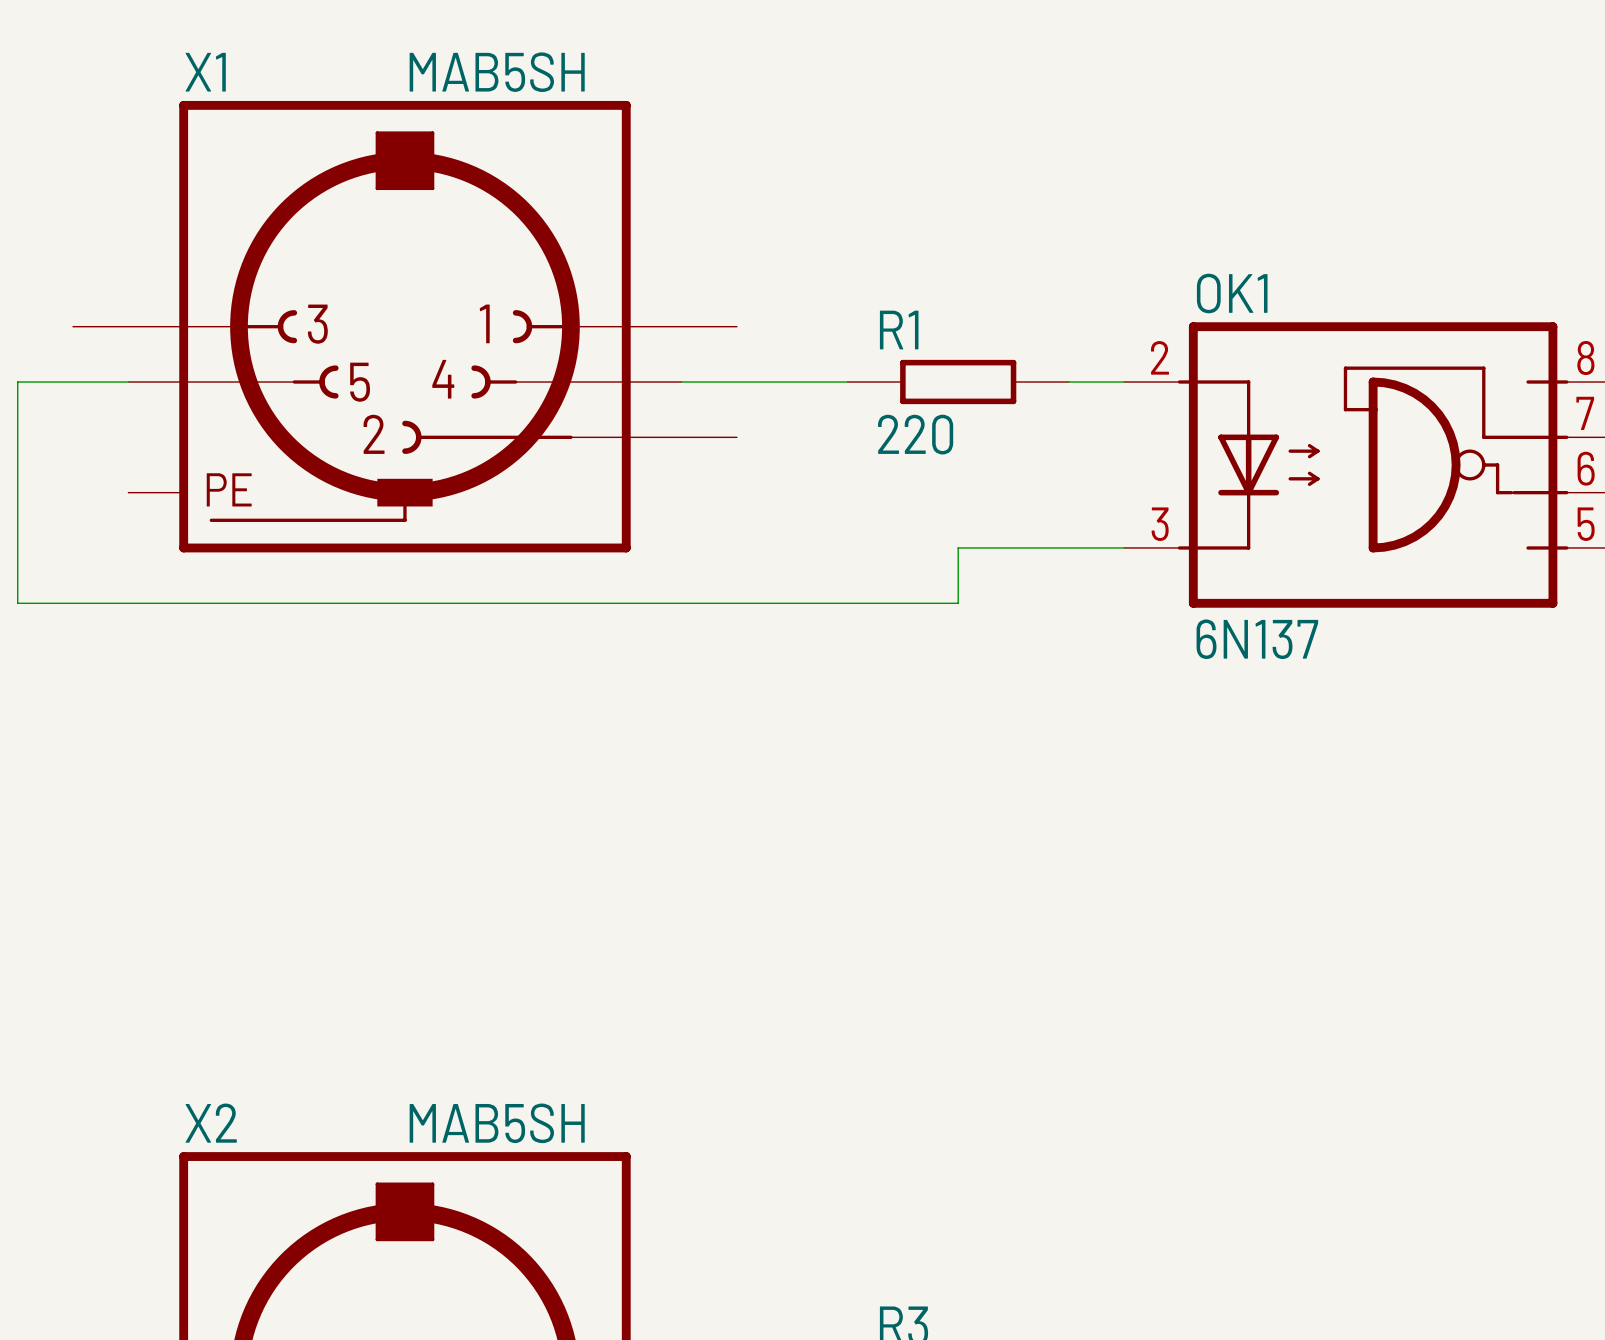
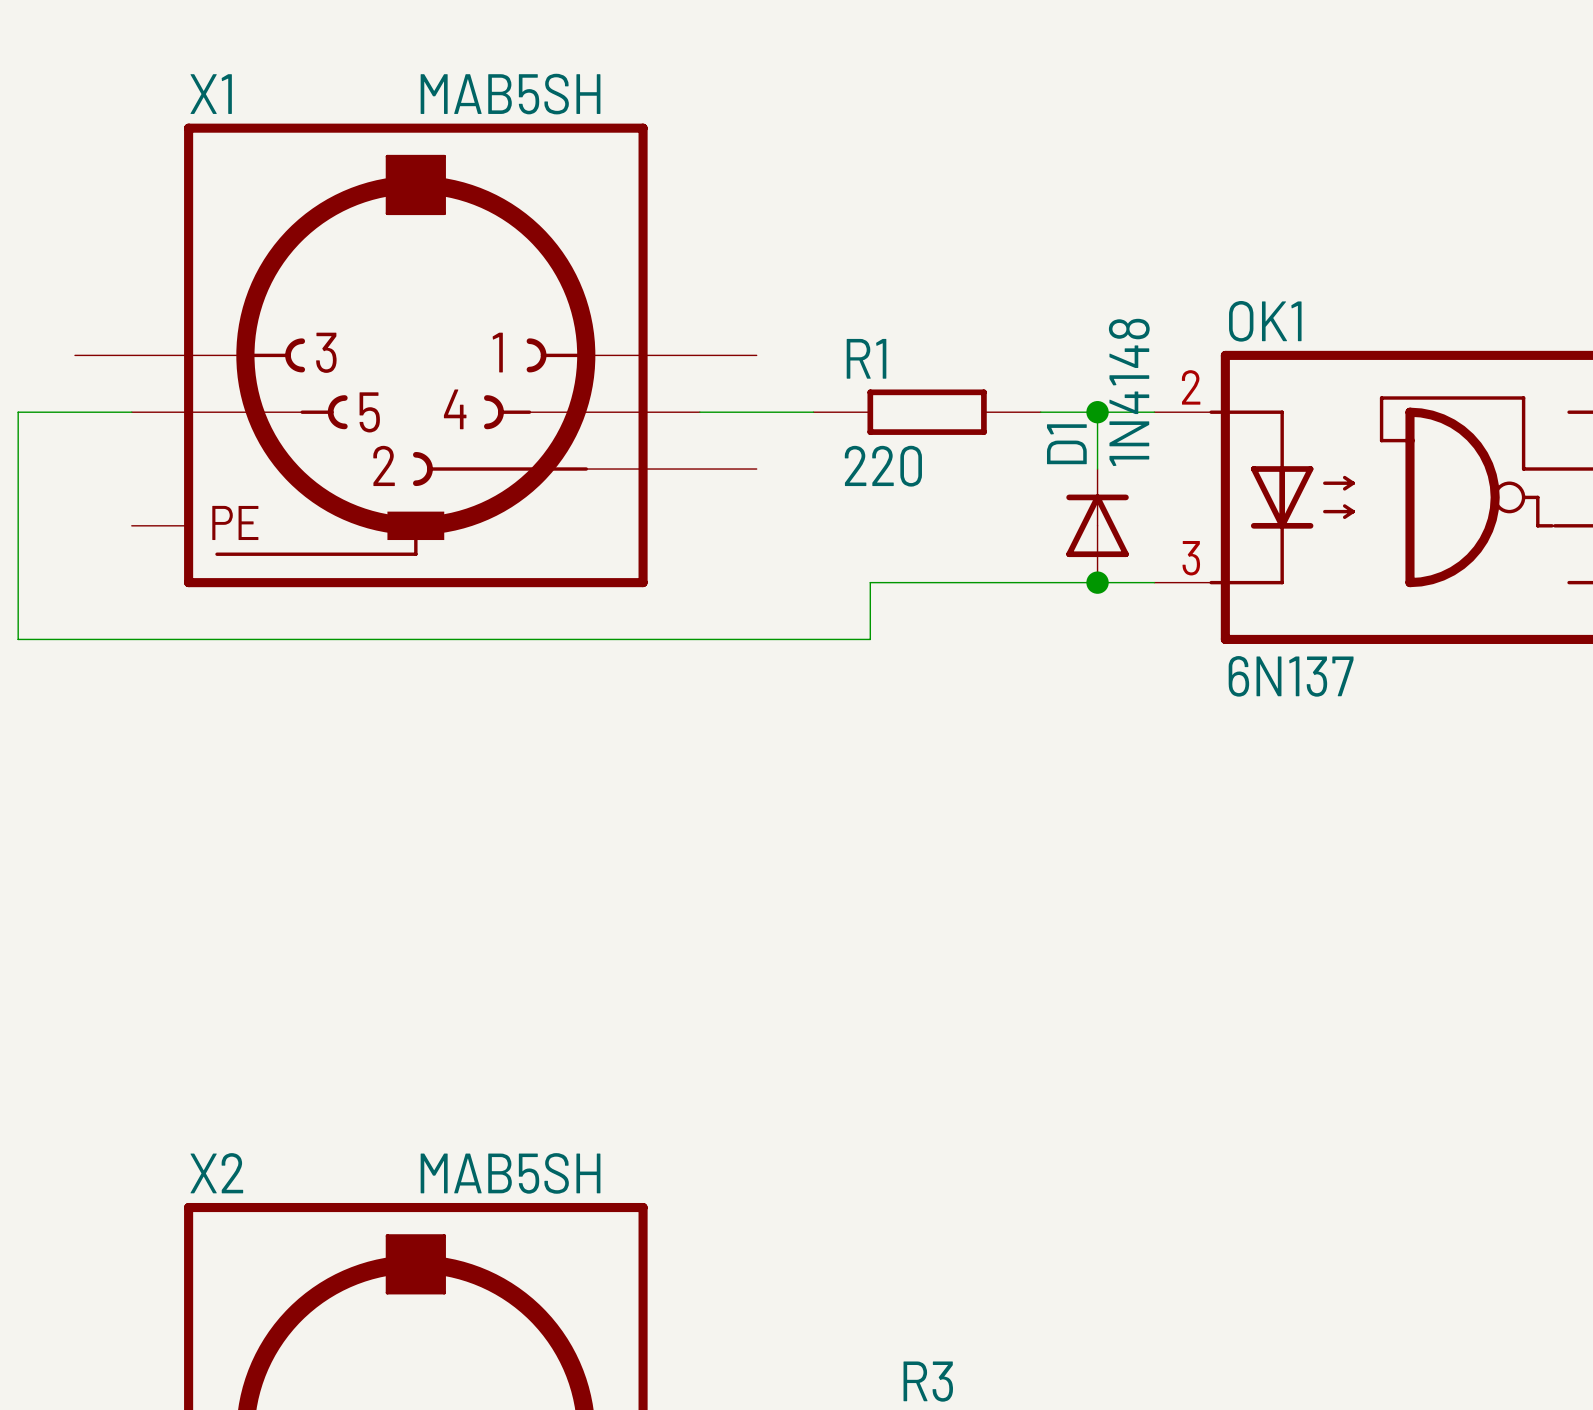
R1 position: (958, 382) -> (927, 412)
wire: none -> (1040, 412) (1097, 412) (1097, 469)
junction: none -> (1097, 412)
D1: none -> 1N4148 (1097, 525)
wire: (958, 547) (958, 603) (847, 603) -> (983, 582) (870, 582) (870, 639)
junction: none -> (1097, 582)

